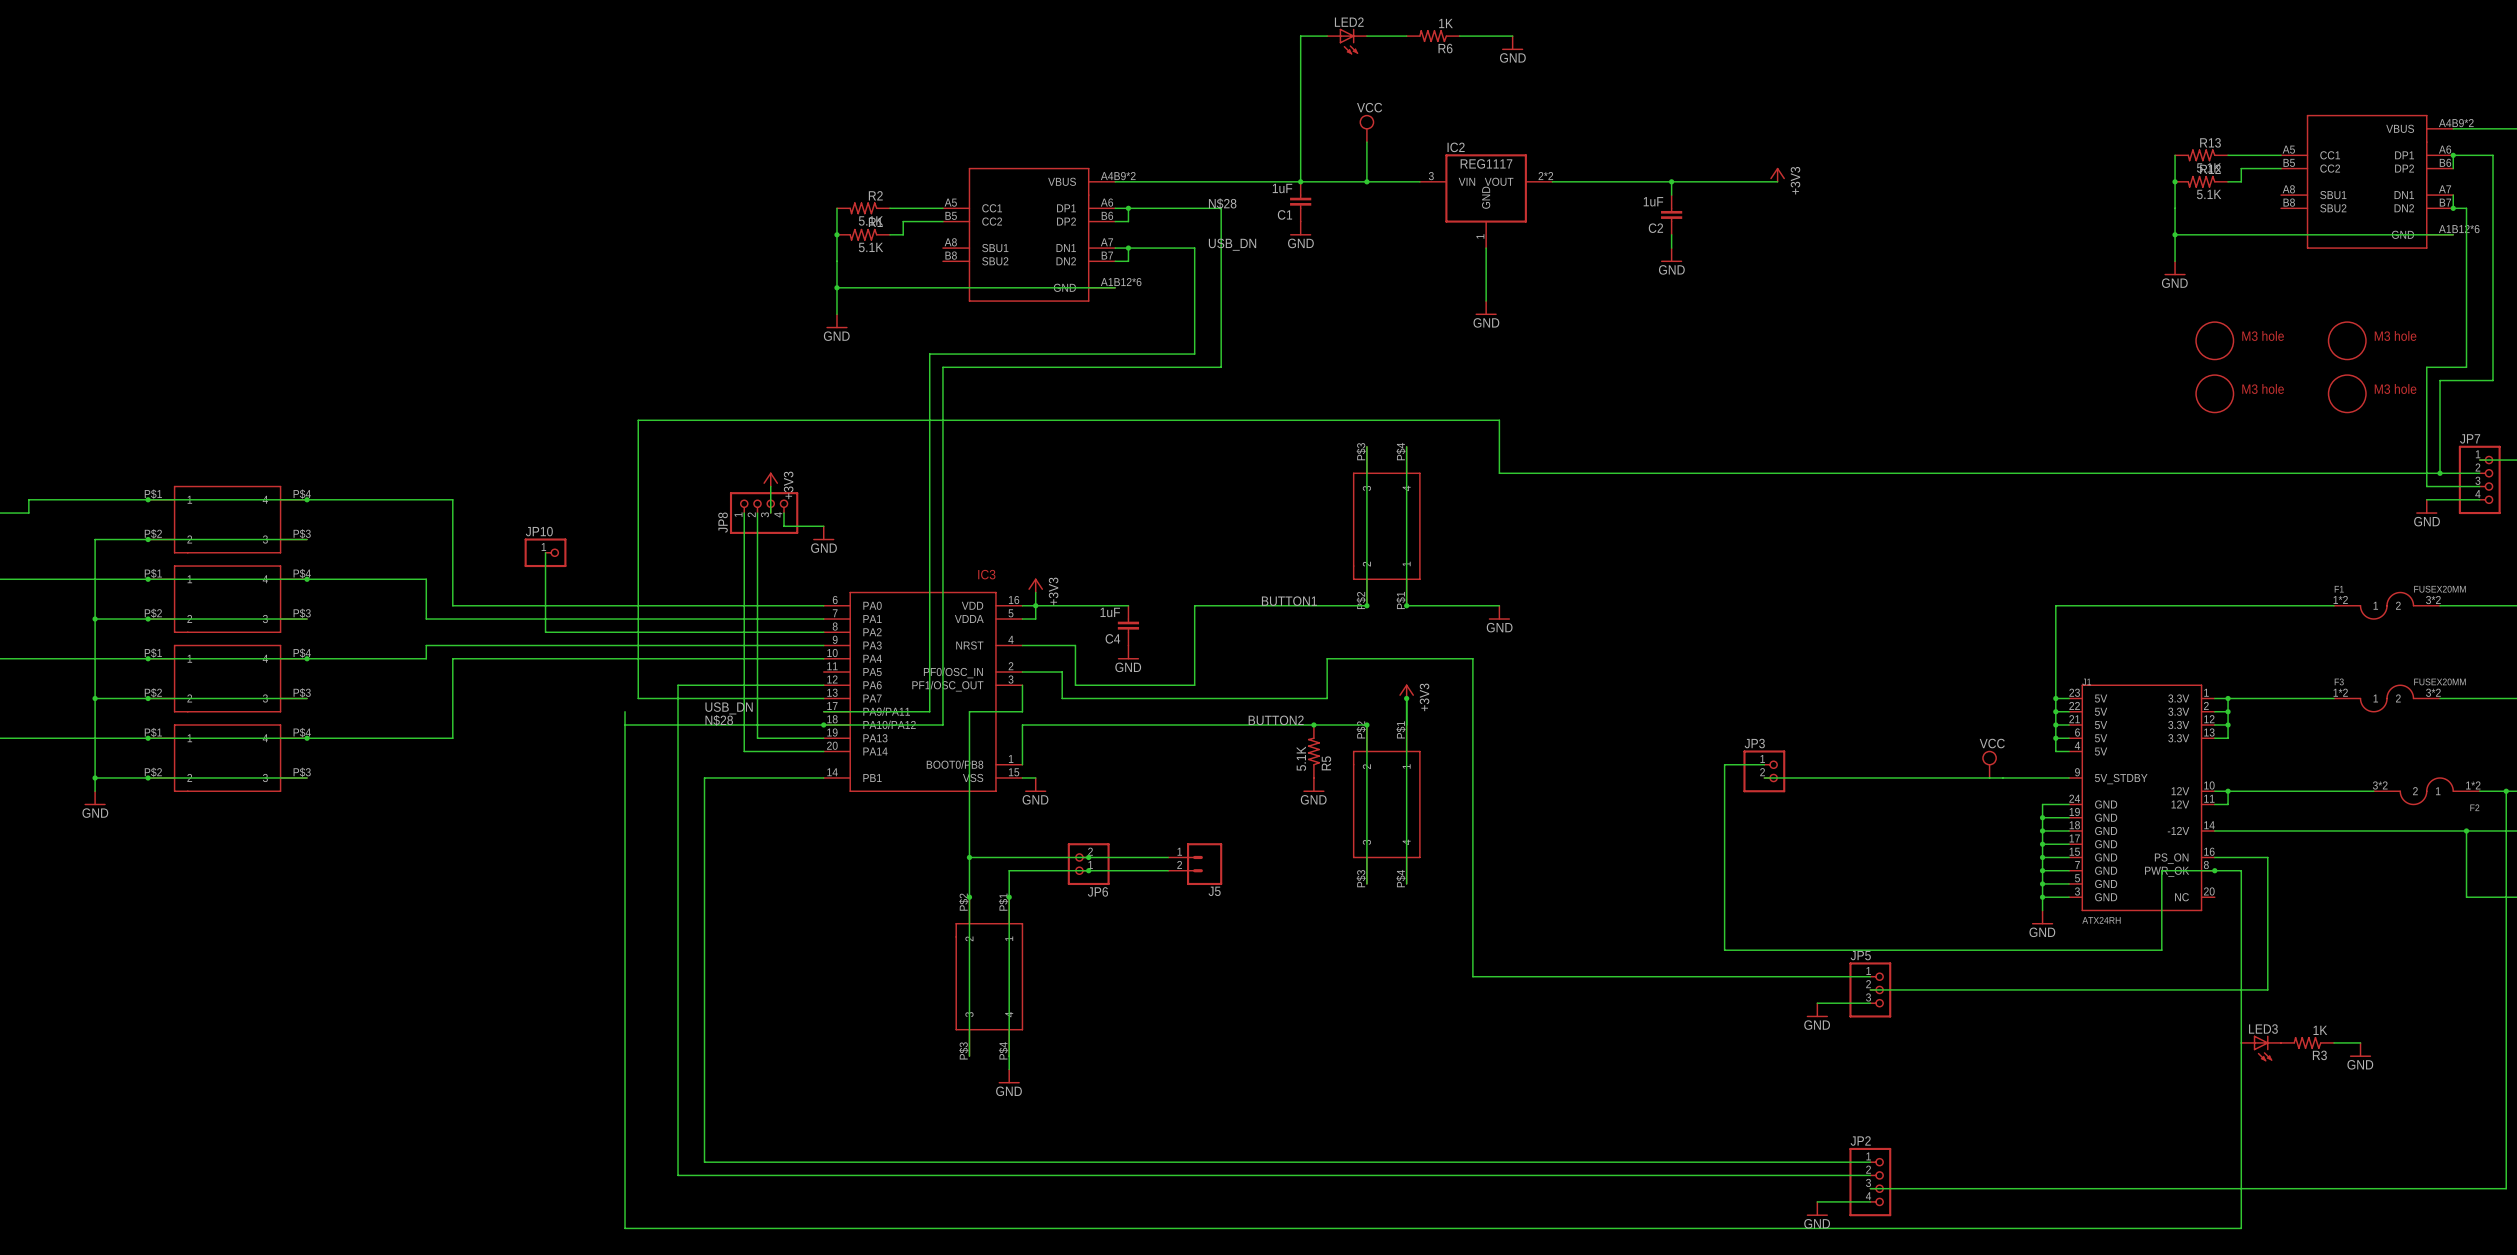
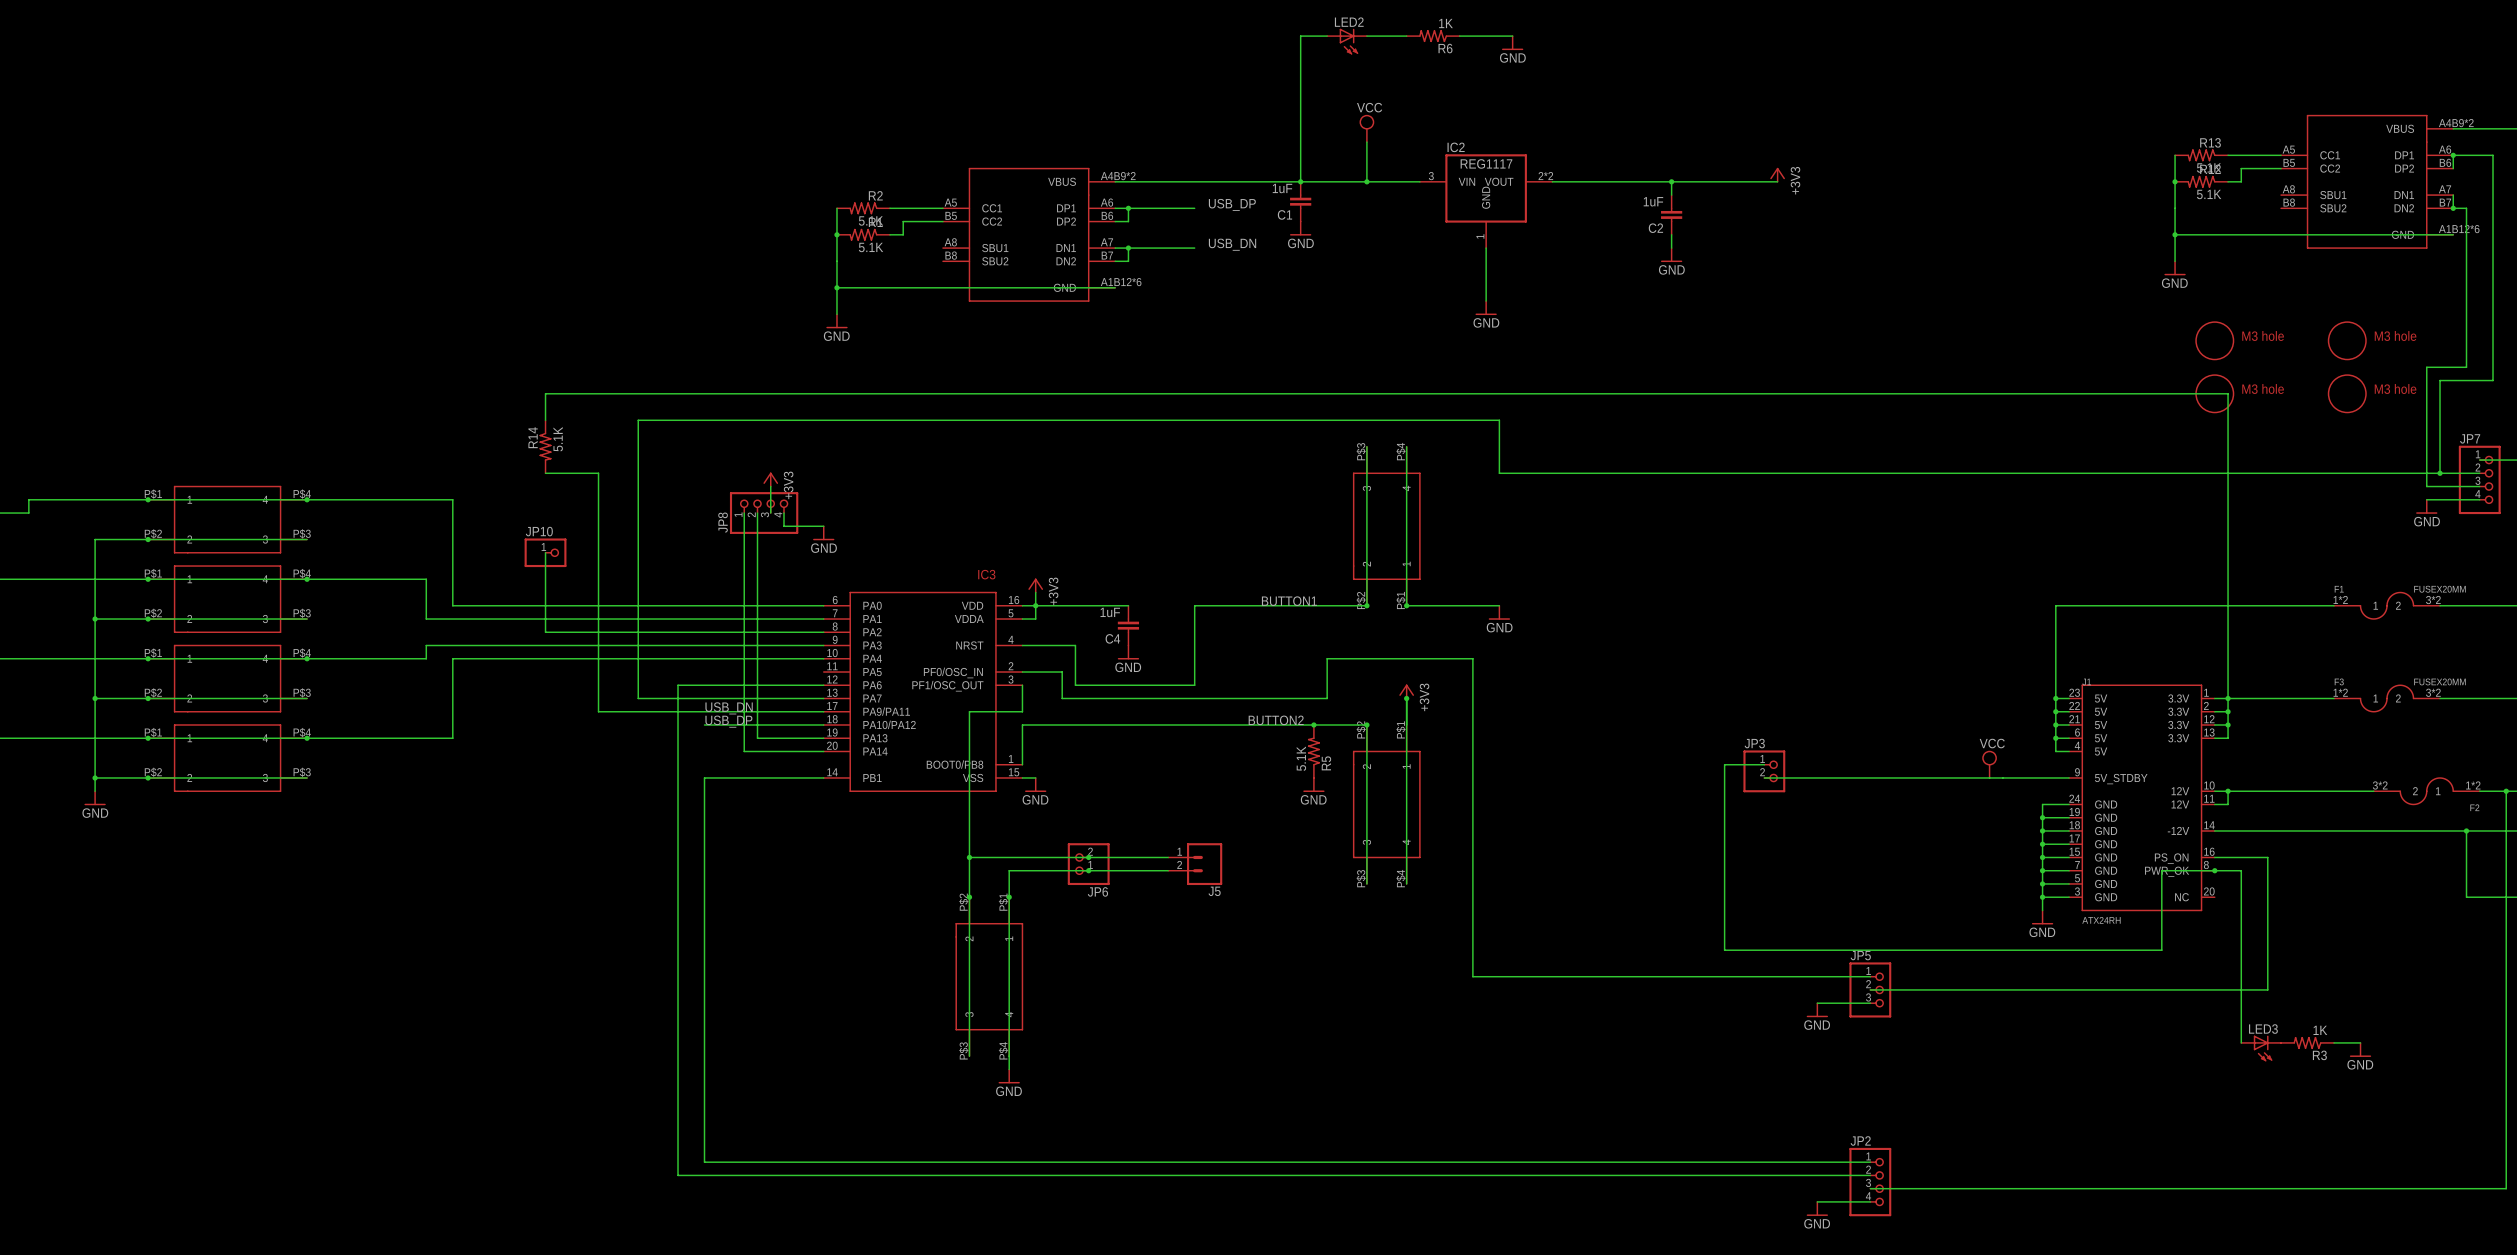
label: N$28 (1222, 203) -> USB_DP (1232, 204)
wire: (1194, 208) (1221, 208) (1221, 367) (942, 367) (942, 725) (823, 725) -> none
wire: (1194, 248) (1194, 354) (929, 354) (929, 711) (823, 711) -> (545, 473) (598, 473) (598, 711) (823, 711)
wire: none -> (545, 420) (545, 393) (2228, 393) (2228, 698)
R14: none -> 5.1K (545, 446)
wire: (625, 711) (625, 1228) (2241, 1228) (2241, 1042) -> none
label: N$28 (719, 720) -> USB_DP (728, 721)
wire: (625, 725) (704, 725) -> none
junction: (823, 725) -> none

